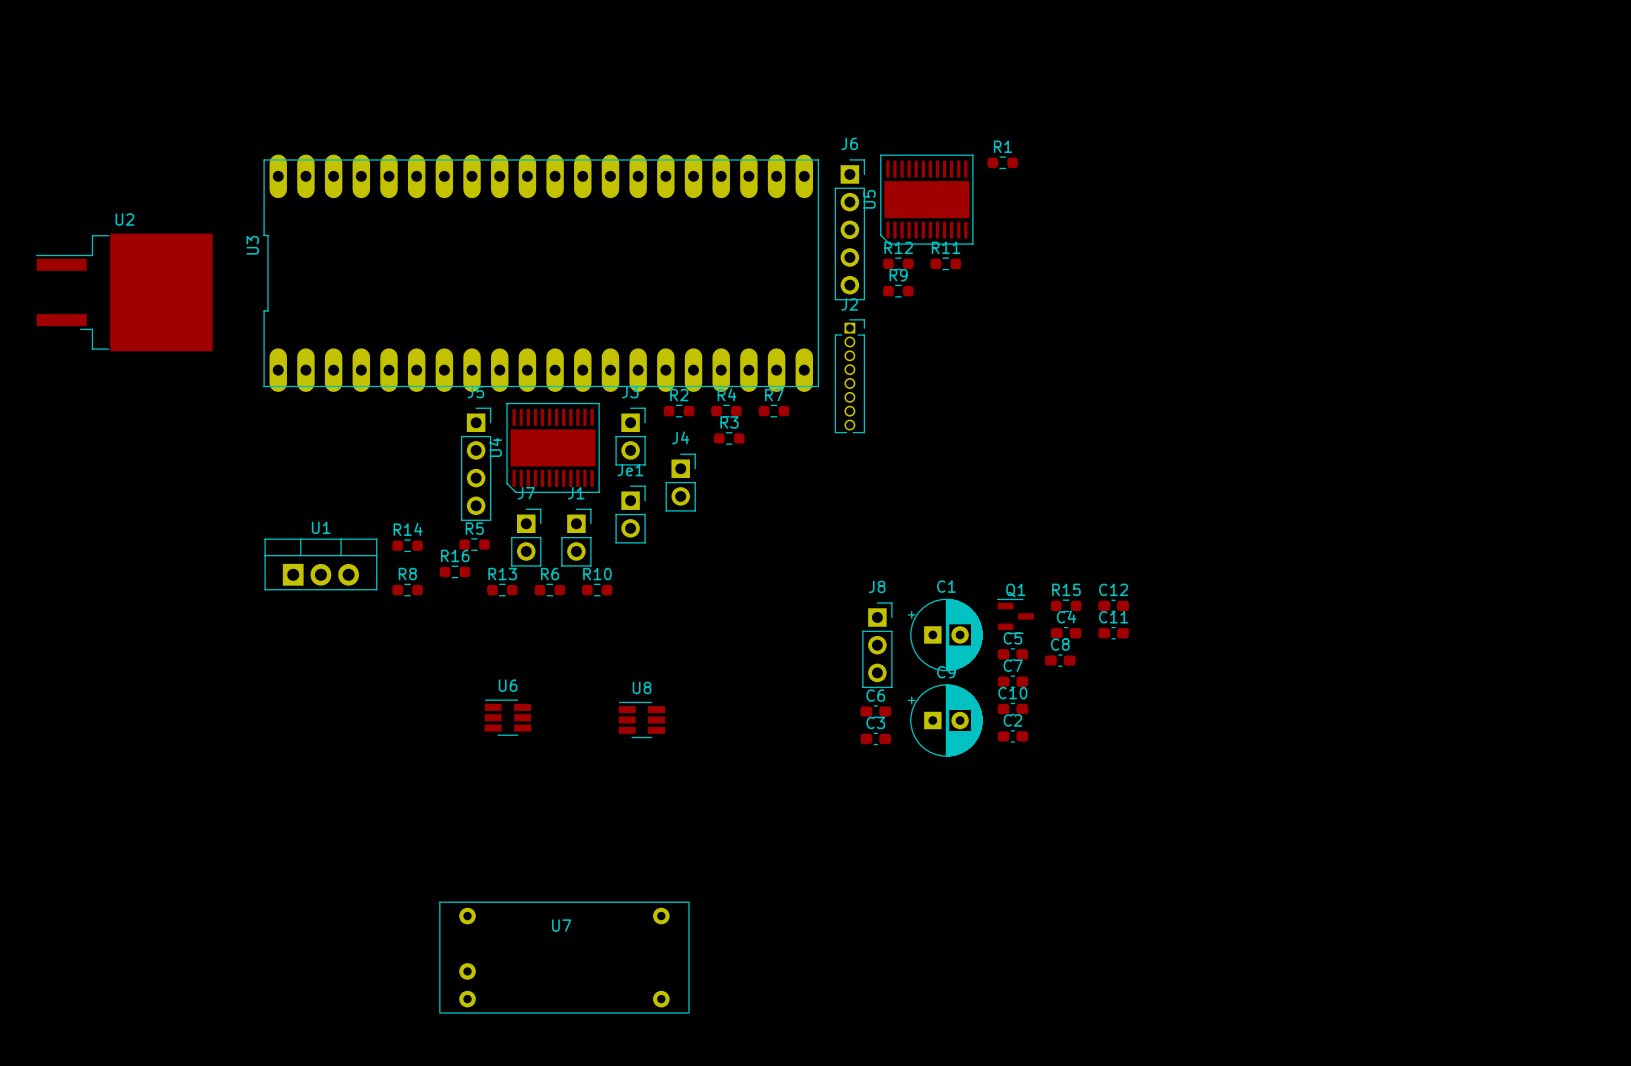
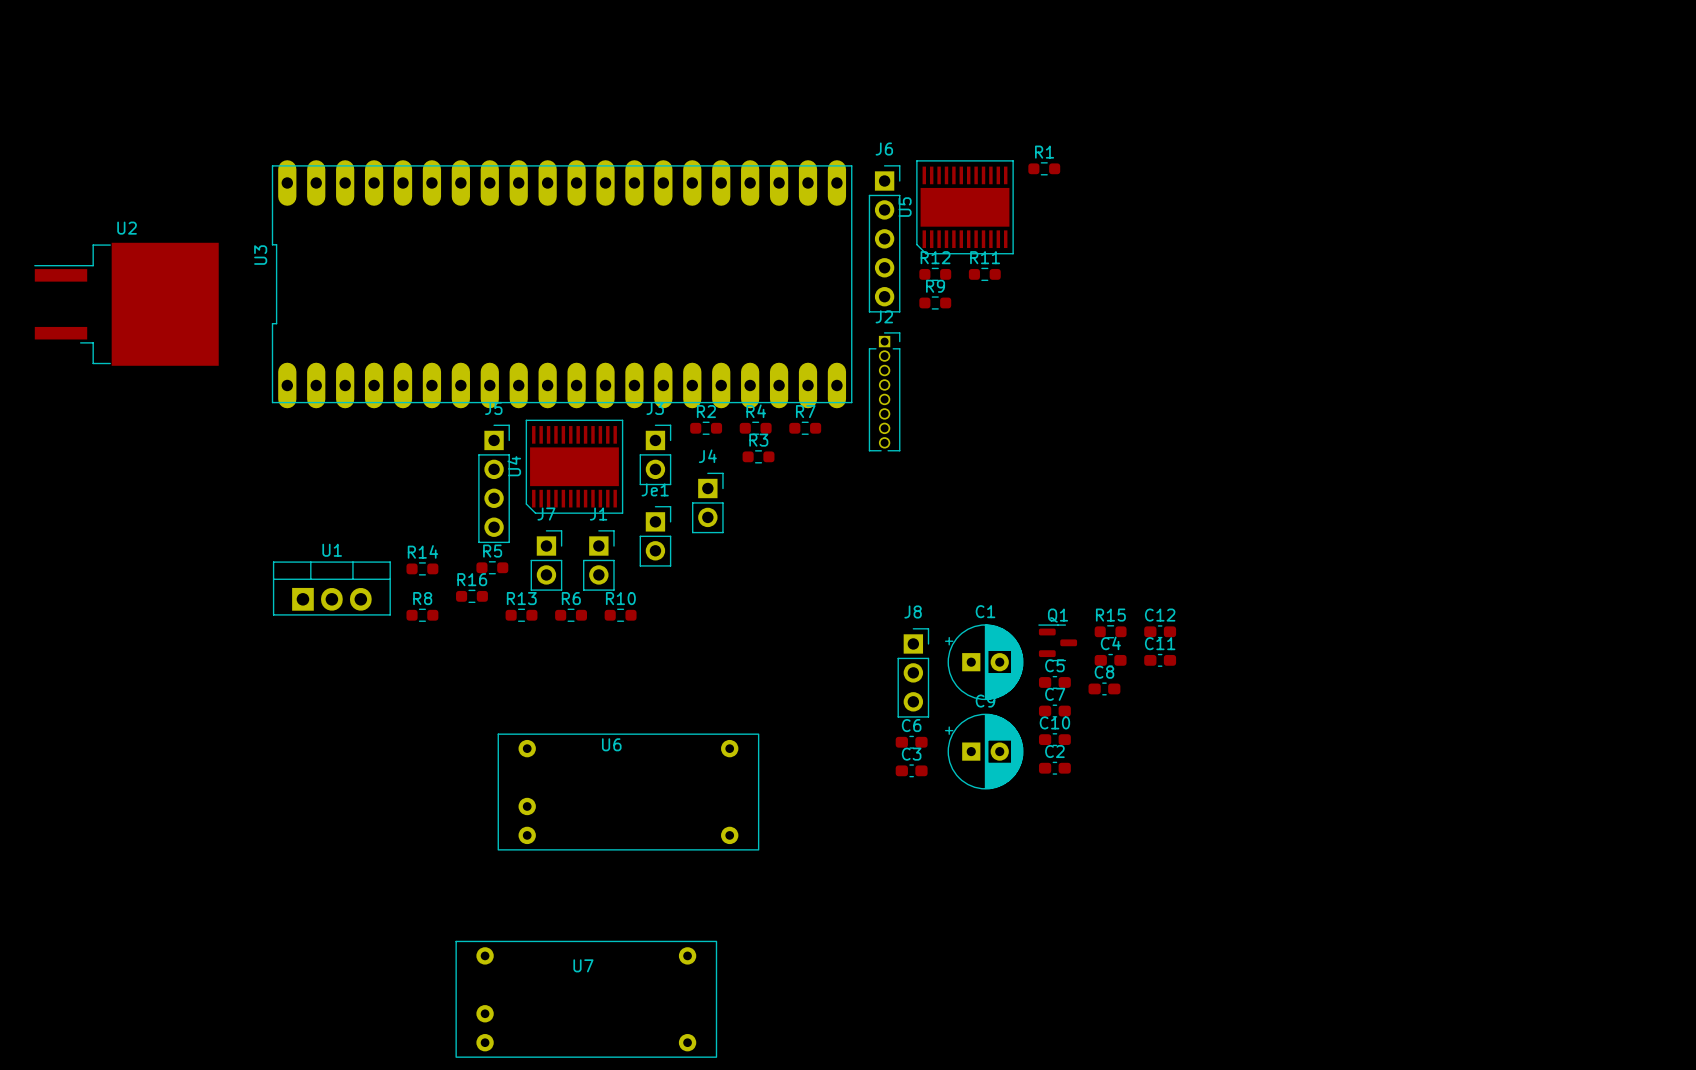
U6 footprint: [484, 699, 532, 736] -> [497, 733, 760, 851]
U8: (641, 719) -> none

